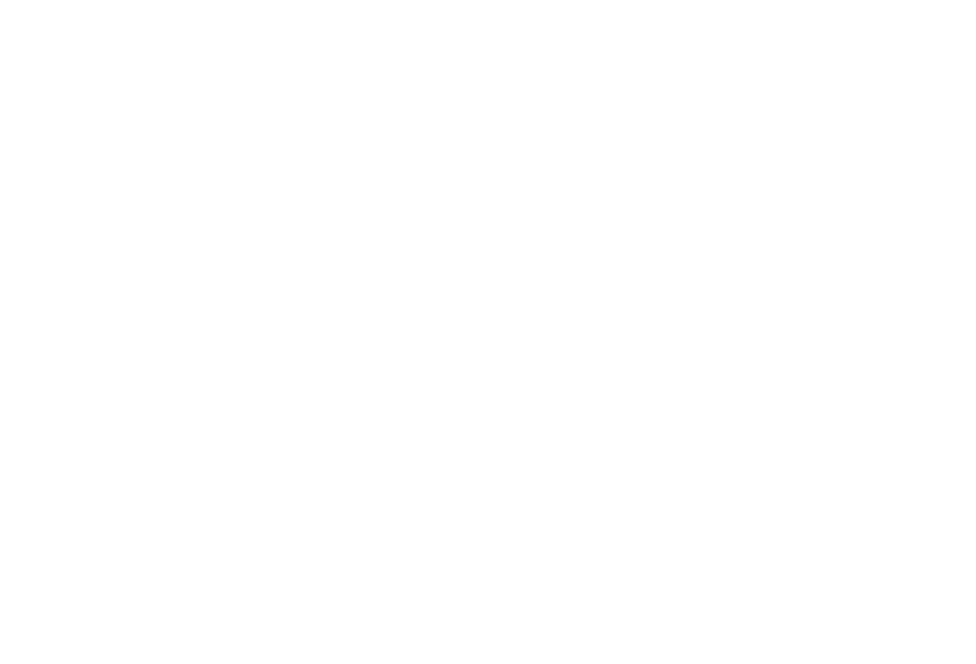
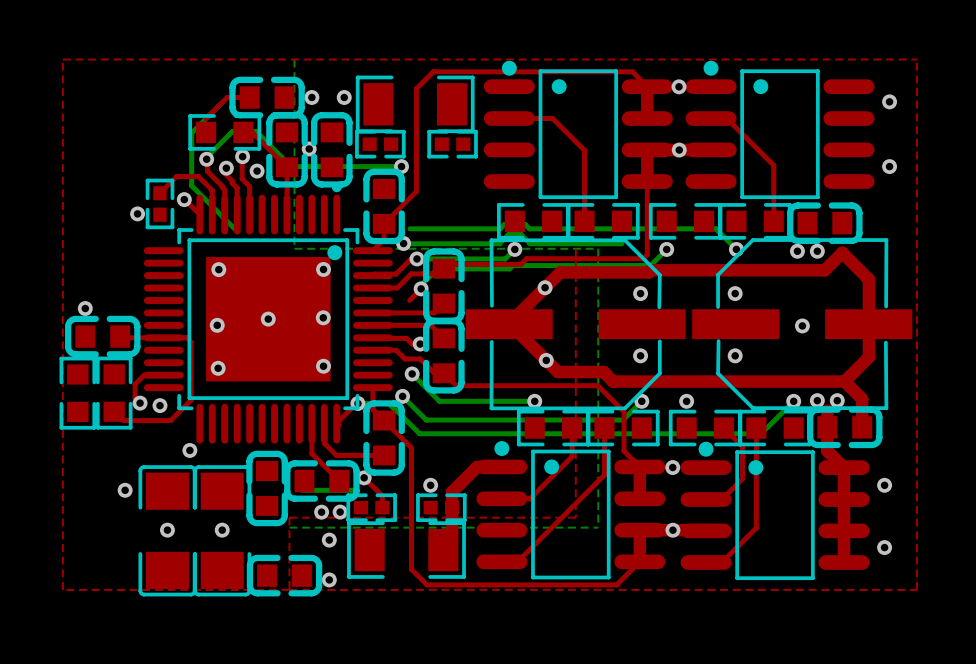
top zone outline: none -> (62, 59) (62, 589) (916, 589) (916, 59) (62, 59)
bottom zone outline: none -> (294, 59) (294, 248) (598, 248) (598, 527) (289, 527)
via: none -> (679, 86)
top track: none -> (249, 97) (227, 97) (206, 118)
part: none -> (267, 97)
via: none -> (311, 97)
via: none -> (344, 97)
via: none -> (889, 101)
bottom track: none -> (220, 103) (191, 133) (191, 185) (237, 231)
part: none -> (415, 104)
top track: none -> (509, 118) (552, 118) (584, 150) (584, 221)
top track: none -> (647, 118) (647, 86) (632, 71) (433, 71) (416, 88) (416, 191) (384, 223) (384, 239) (372, 250)
top track: none -> (711, 118) (726, 118) (773, 165) (773, 221)
part: none -> (578, 129)
part: none -> (780, 129)
part: none -> (224, 132)
top track: none -> (243, 132) (252, 132) (287, 167) (287, 214)
part: none -> (380, 144)
part: none -> (452, 144)
via: none -> (309, 148)
part: none -> (287, 149)
part: none -> (331, 149)
top track: none -> (711, 149) (647, 149) (647, 254) (643, 258) (526, 258) (521, 264) (448, 264) (438, 273) (423, 273)
via: none -> (679, 150)
top track: none -> (242, 156) (242, 179) (249, 186) (249, 214)
via: none -> (242, 156)
bottom track: none -> (206, 157) (232, 131) (256, 131) (291, 166) (401, 166)
top track: none -> (206, 159) (210, 162) (207, 165) (207, 171) (224, 189) (224, 214)
via: none -> (206, 159)
via: none -> (401, 166)
via: none -> (889, 166)
top track: none -> (226, 168) (224, 172) (237, 188) (237, 214)
via: none -> (226, 168)
via: none -> (257, 171)
top track: none -> (159, 193) (176, 176) (198, 176) (212, 190) (212, 214)
top track: none -> (184, 199) (199, 214)
via: none -> (184, 199)
part: none -> (159, 203)
part: none -> (384, 206)
via: none -> (137, 213)
part: none -> (533, 221)
part: none -> (603, 221)
part: none -> (685, 221)
part: none -> (755, 221)
part: none -> (824, 223)
bottom track: none -> (410, 228) (500, 228) (504, 224) (525, 224) (529, 228) (715, 228) (736, 249)
bottom track: none -> (403, 243) (499, 243) (508, 234) (521, 234) (529, 243) (621, 243)
via: none -> (403, 243)
top zone outline: none -> (575, 248) (575, 517) (289, 517) (289, 589)
bottom track: none -> (514, 249) (505, 258) (416, 258)
via: none -> (514, 249)
bottom track: none -> (666, 249) (650, 265) (512, 265) (509, 268) (437, 268) (421, 285) (421, 288)
via: none -> (666, 249)
via: none -> (736, 249)
via: none -> (797, 251)
via: none -> (817, 251)
top track: none -> (416, 258) (411, 258) (395, 274) (372, 275)
via: none -> (416, 258)
via: none -> (218, 269)
via: none -> (323, 269)
top track: none -> (423, 273) (411, 273) (397, 287) (372, 287)
part: none -> (443, 286)
via: none -> (545, 287)
top track: none -> (421, 288) (409, 300)
via: none -> (421, 288)
via: none -> (640, 293)
via: none -> (735, 293)
top track: none -> (443, 303) (434, 312) (372, 312)
via: none -> (85, 308)
part: none -> (268, 312)
via: none -> (323, 317)
via: none -> (268, 319)
part: none -> (575, 324)
part: none -> (802, 324)
via: none -> (217, 325)
top track: none -> (372, 325) (430, 325) (443, 338)
via: none -> (802, 325)
part: none -> (102, 336)
top track: none -> (121, 337) (186, 337) (191, 342) (191, 400) (170, 420) (123, 420) (114, 411)
top track: none -> (372, 337) (406, 338) (412, 344) (420, 344)
via: none -> (420, 344)
top track: none -> (372, 350) (396, 350) (404, 358) (420, 358) (434, 373) (443, 373) (456, 385) (597, 385) (624, 411) (624, 451) (639, 466) (639, 498)
part: none -> (443, 355)
via: none -> (640, 355)
via: none -> (735, 355)
via: none -> (546, 360)
via: none -> (323, 366)
via: none -> (218, 368)
bottom track: none -> (412, 373) (439, 401) (534, 401)
via: none -> (412, 373)
top track: none -> (163, 375) (144, 375) (135, 384) (135, 398) (140, 403)
top track: none -> (844, 381) (613, 381) (603, 371) (557, 371) (509, 323) (560, 272) (824, 270) (842, 252) (868, 279) (868, 357) (844, 381)
top track: none -> (844, 381) (862, 399) (862, 427)
top track: none -> (372, 387) (372, 409) (411, 447) (411, 569) (426, 584) (616, 584) (639, 561) (639, 530) (706, 530)
part: none -> (77, 393)
part: none -> (114, 393)
bottom track: none -> (402, 396) (426, 420) (623, 420) (641, 401)
via: none -> (402, 396)
via: none -> (817, 400)
via: none -> (837, 400)
via: none -> (534, 401)
via: none -> (641, 401)
via: none -> (686, 401)
bottom track: none -> (793, 401) (761, 433) (419, 433) (388, 403) (357, 403)
via: none -> (793, 401)
via: none -> (140, 403)
top track: none -> (357, 403) (338, 421) (338, 425) (336, 423)
via: none -> (357, 403)
via: none -> (159, 405)
top track: none -> (827, 410) (827, 450) (843, 467) (843, 562)
top track: none -> (311, 423) (311, 453) (339, 481)
top track: none -> (324, 423) (324, 443) (336, 455) (384, 455)
part: none -> (844, 427)
part: none -> (553, 428)
top track: none -> (572, 428) (572, 456) (529, 498) (501, 498)
top track: none -> (604, 428) (604, 475) (517, 561) (501, 561)
part: none -> (623, 428)
part: none -> (705, 428)
top track: none -> (723, 428) (742, 446) (742, 478) (721, 499) (706, 499)
top track: none -> (756, 428) (756, 528) (721, 562) (706, 562)
part: none -> (775, 428)
part: none -> (384, 438)
via: none -> (189, 450)
top track: none -> (501, 466) (477, 466) (452, 492) (452, 541)
via: none -> (672, 467)
top track: none -> (364, 477) (382, 496) (382, 507)
via: none -> (364, 477)
part: none -> (321, 481)
via: none -> (430, 485)
via: none -> (884, 485)
part: none -> (267, 488)
via: none -> (125, 490)
bottom track: none -> (301, 490) (355, 490)
part: none -> (371, 507)
part: none -> (441, 507)
part: none -> (570, 510)
part: none -> (775, 510)
via: none -> (321, 512)
via: none -> (340, 512)
part: none -> (167, 530)
via: none -> (167, 530)
part: none -> (222, 530)
via: none -> (222, 530)
via: none -> (672, 530)
via: none -> (329, 540)
via: none -> (884, 547)
part: none -> (406, 550)
part: none -> (284, 575)
via: none -> (329, 579)

